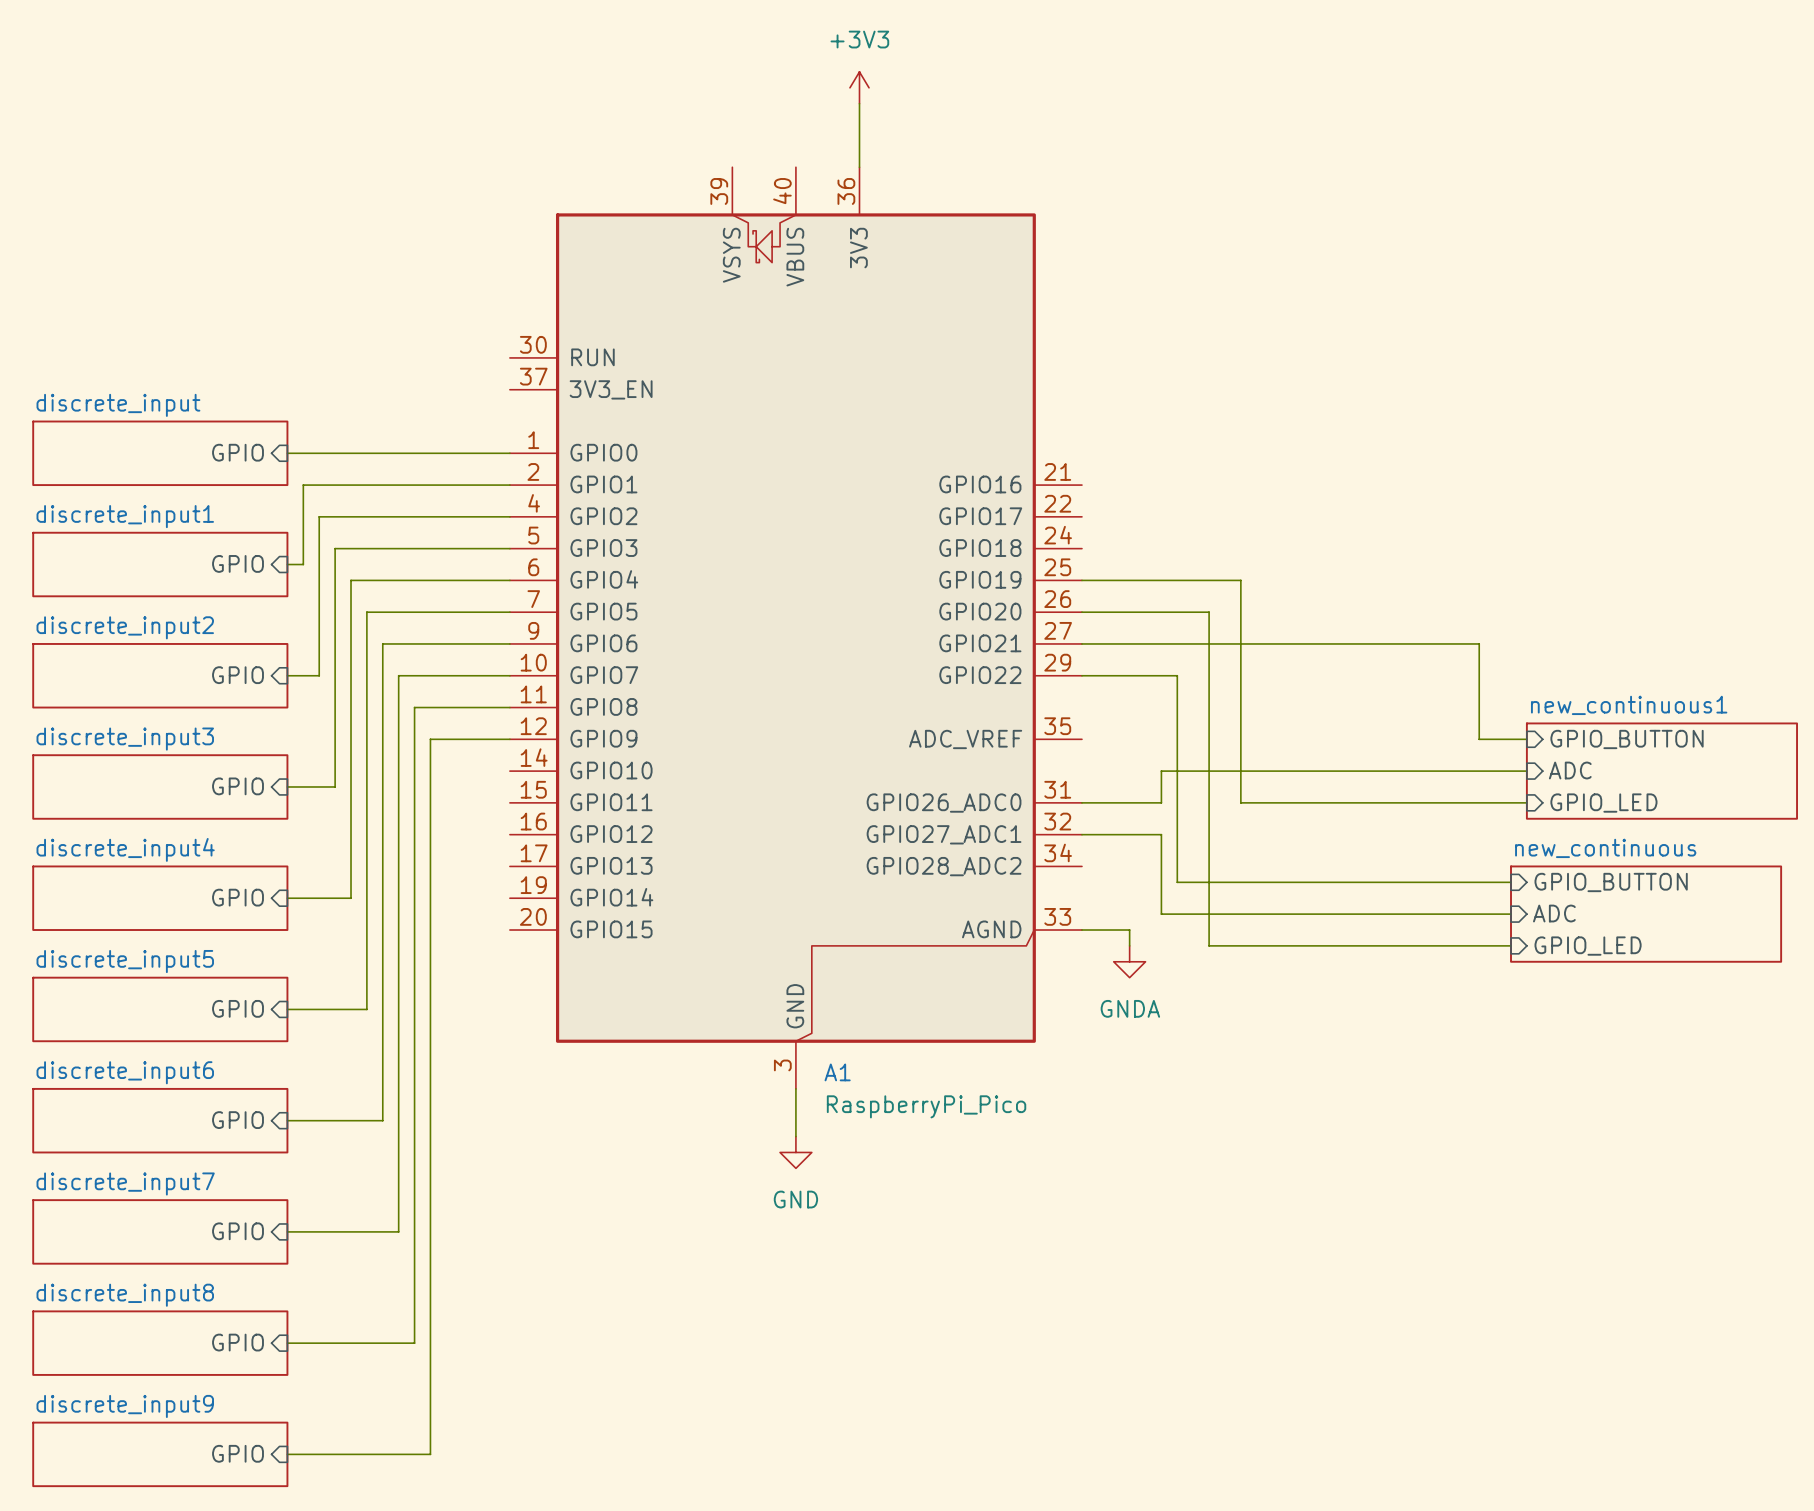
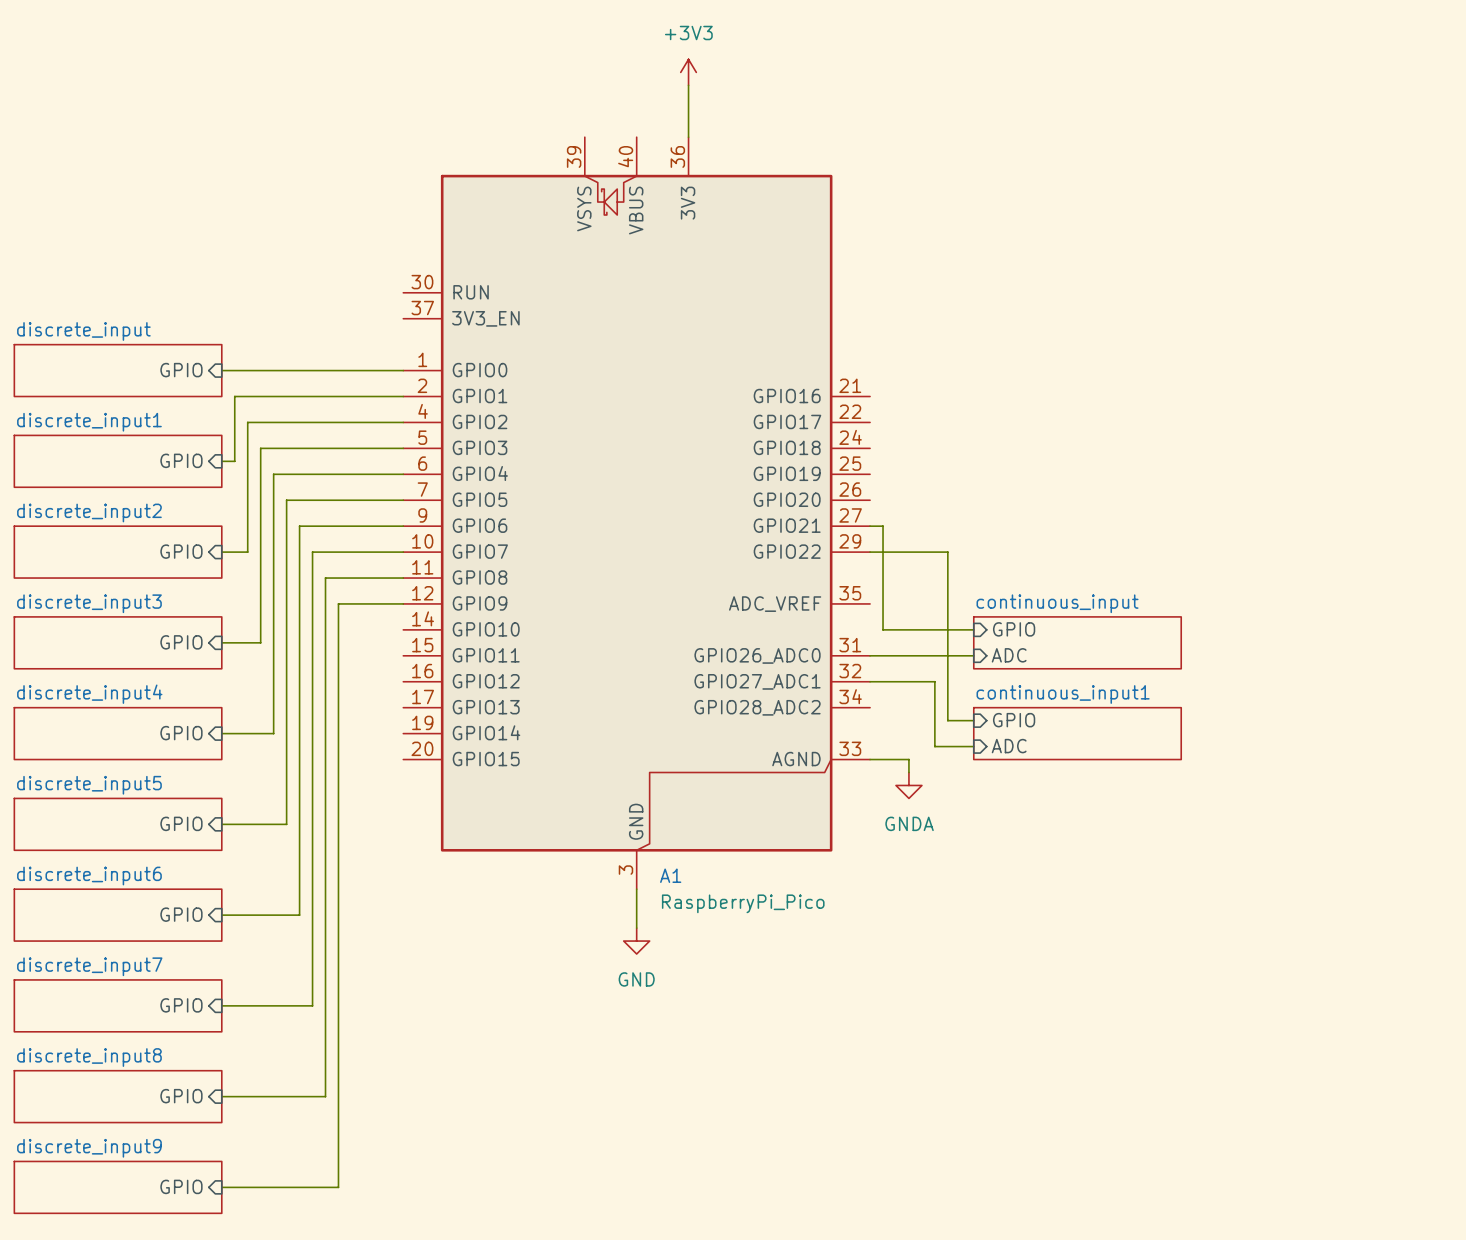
wire: (1081, 580) (1240, 580) (1240, 802) (1526, 802) -> none
wire: (1081, 612) (1209, 612) (1209, 945) (1511, 945) -> none
wire: (1097, 643) (1479, 643) (1479, 739) (1526, 739) -> (883, 526) (883, 629) (934, 629)
sheet pin: GPIO_BUTTON (1627, 739) -> none
sheet pin: none -> GPIO (1014, 629)
sheet pin: ADC (1570, 770) -> none
wire: (1161, 771) (1161, 802) -> (973, 655) (934, 655)
wire: (1209, 771) (1526, 771) -> none
sheet new_continuous1: (1661, 771) -> none
sheet continuous_input: none -> (1077, 642)
sheet pin: none -> ADC (1009, 655)
sheet pin: GPIO_LED (1603, 803) -> none
sheet pin: none -> GPIO (1014, 720)
wire: (1209, 882) (1511, 882) -> none
sheet pin: GPIO_BUTTON (1611, 882) -> none
sheet continuous_input1: none -> (1077, 733)
sheet pin: none -> ADC (1009, 746)
sheet pin: ADC (1554, 913) -> none
wire: (1209, 914) (1511, 914) -> none
sheet new_continuous: (1646, 914) -> none
sheet pin: GPIO_LED (1588, 946) -> none

